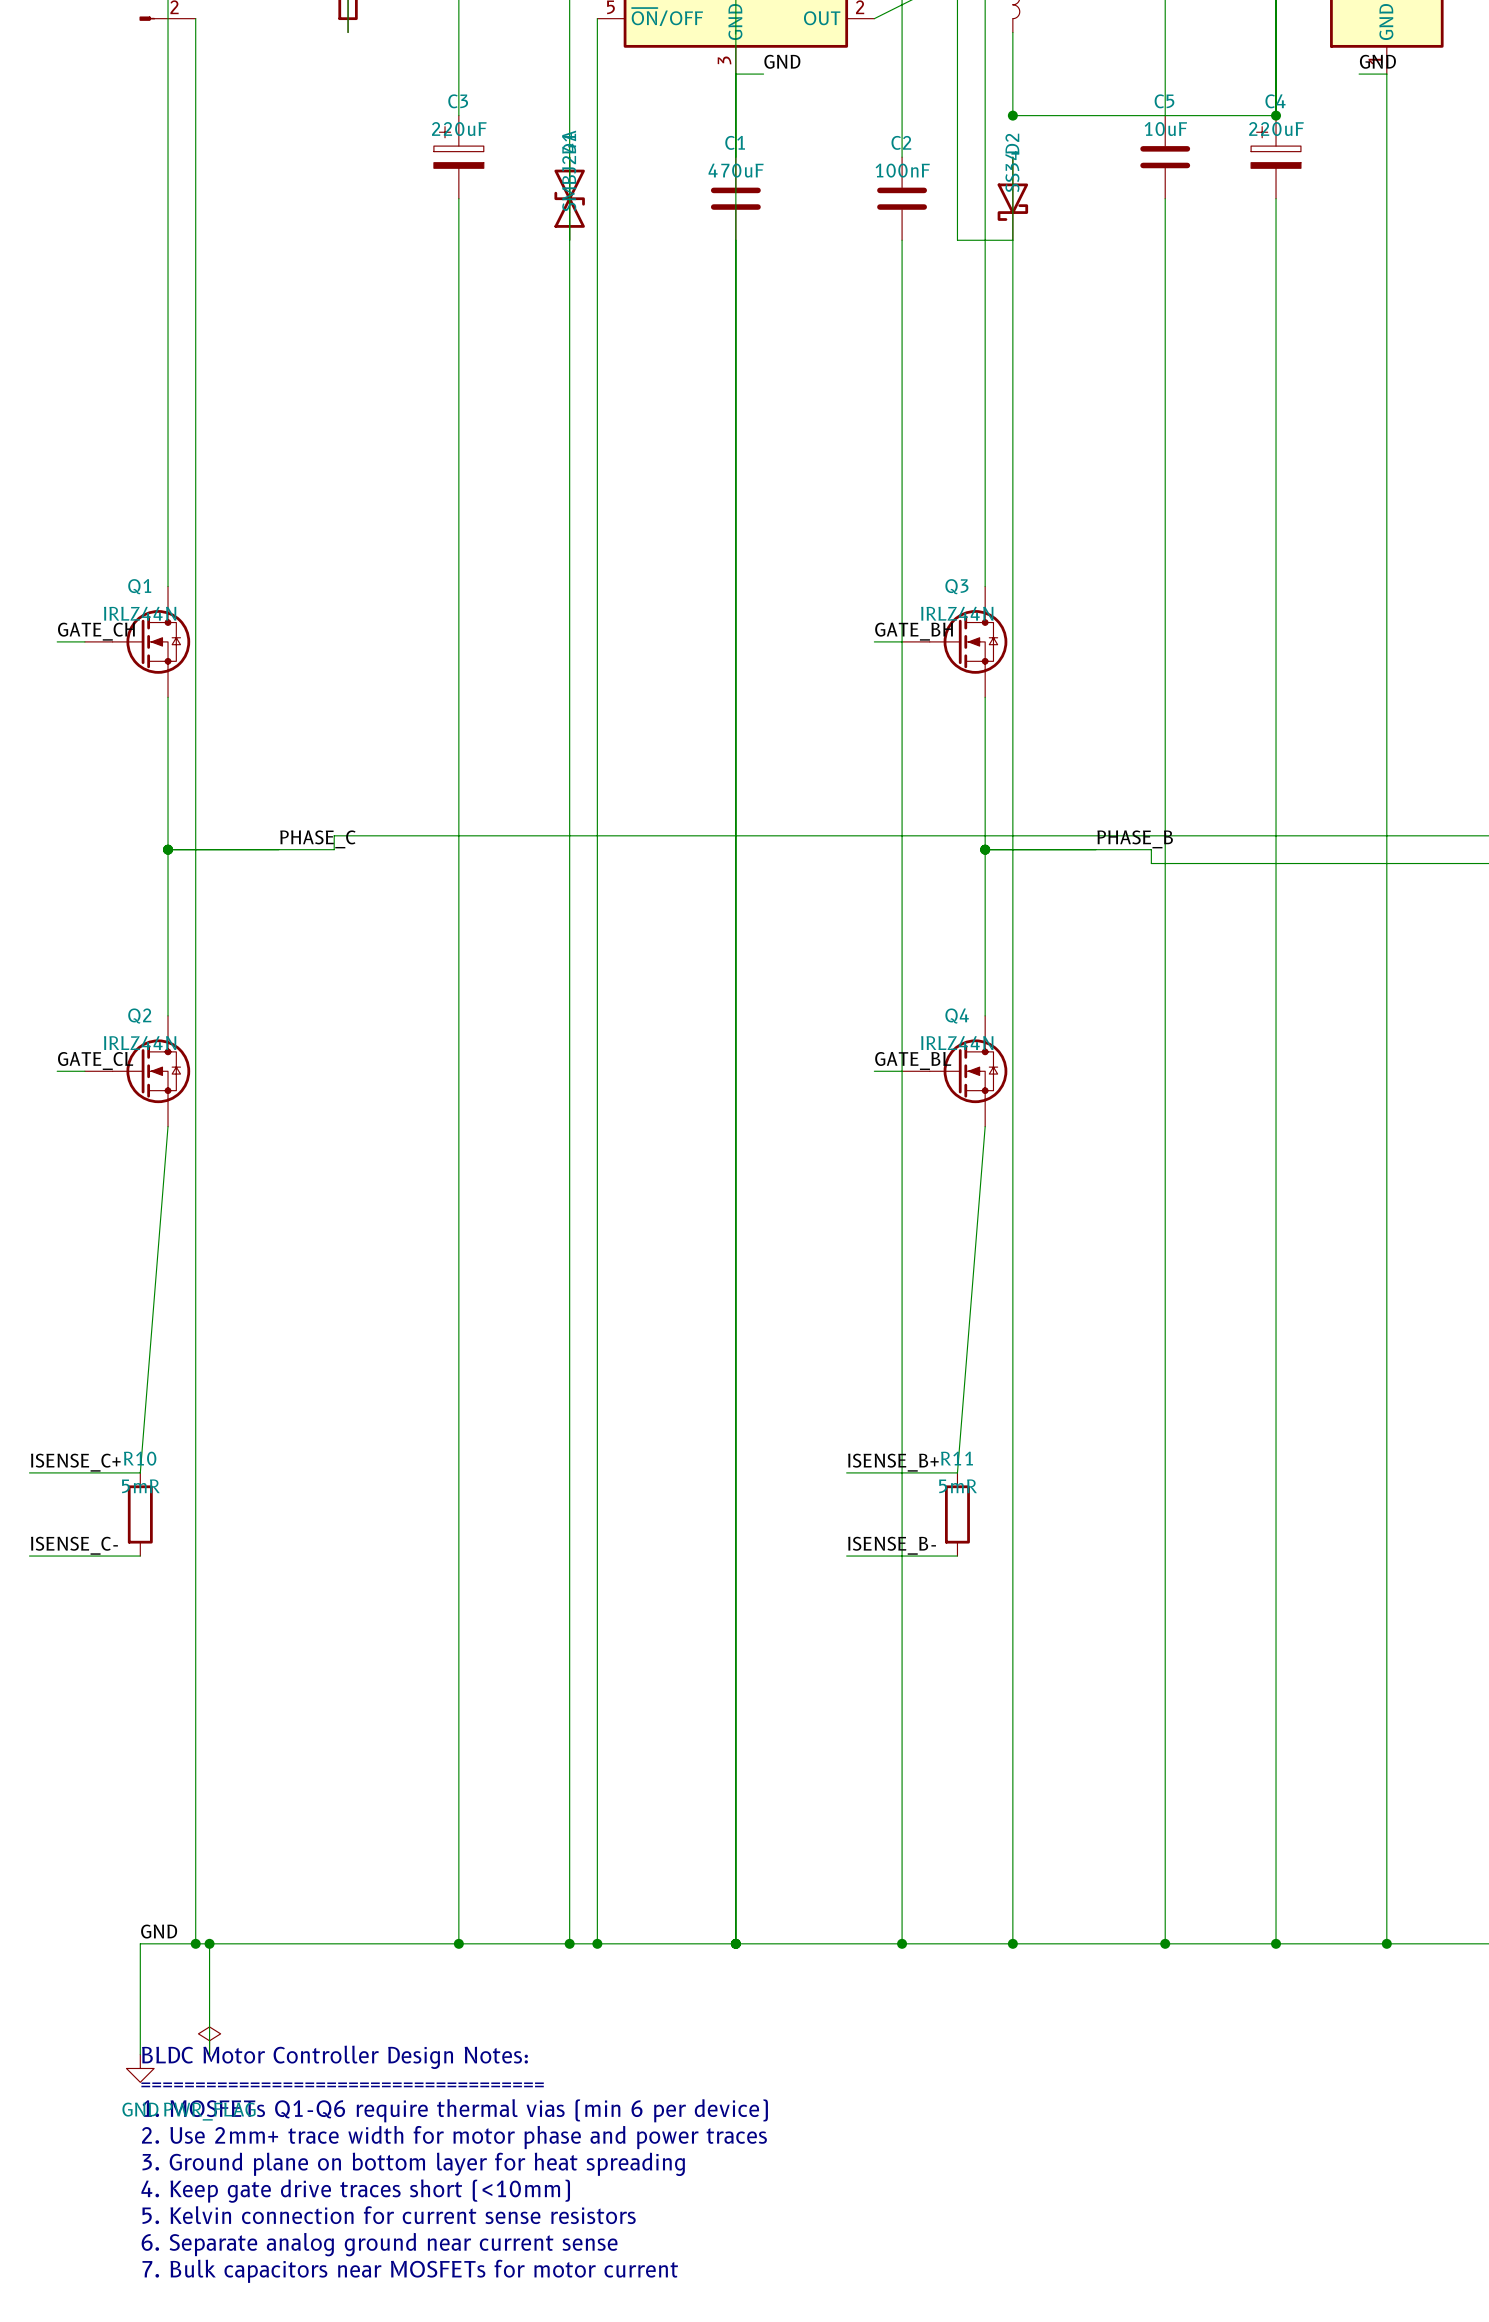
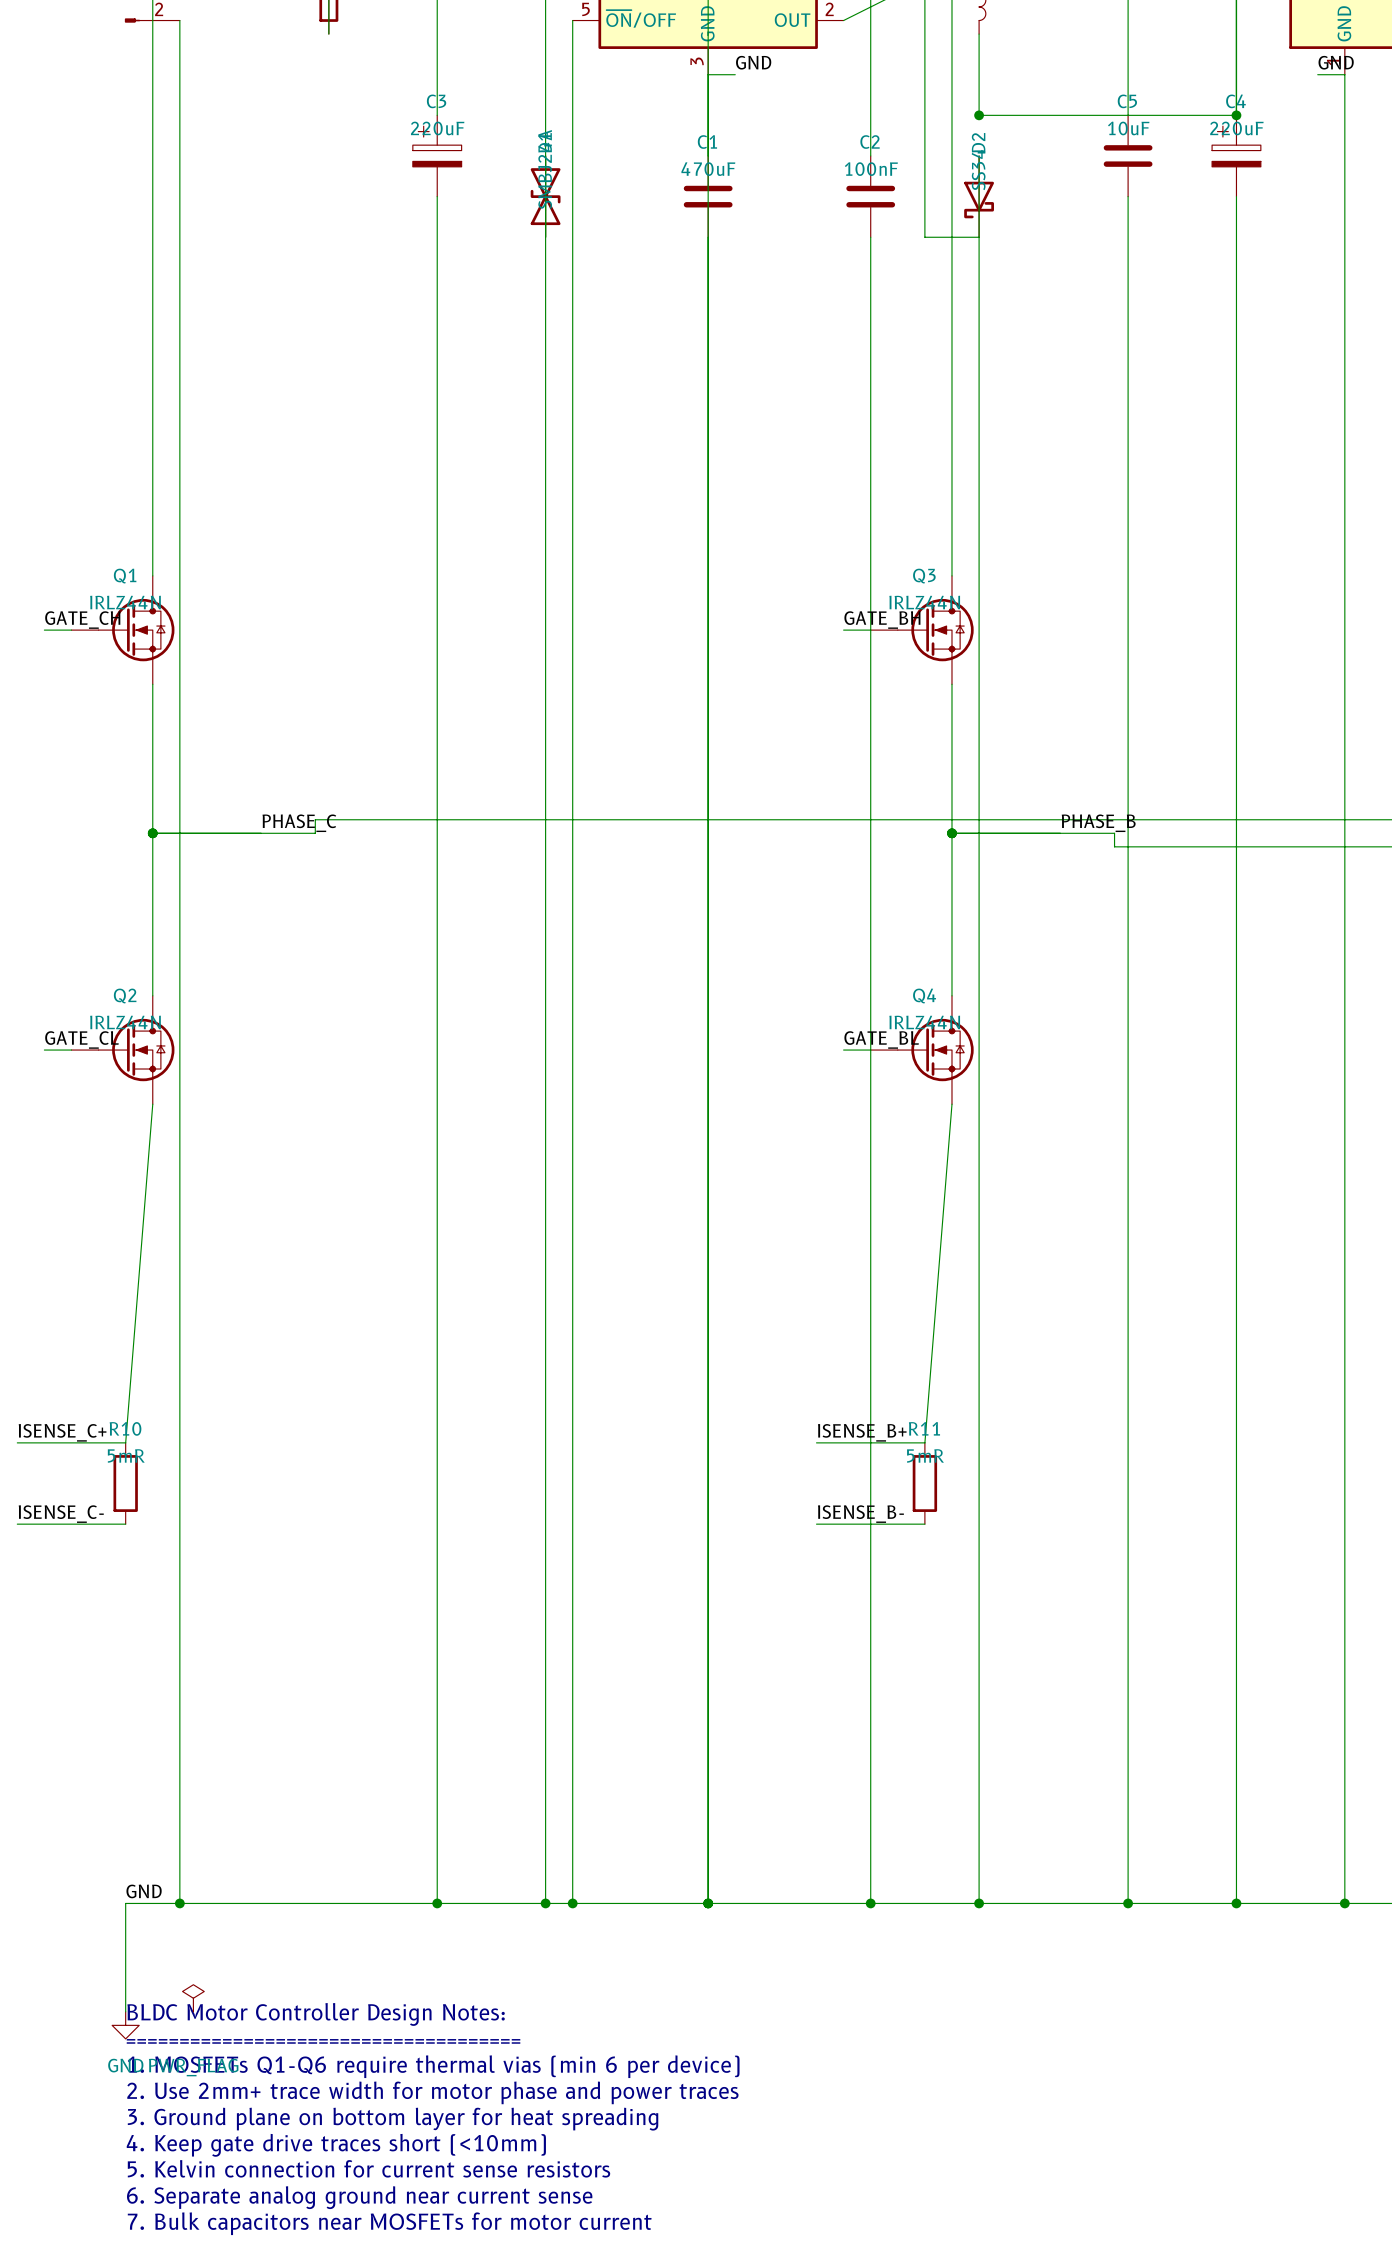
wire: (209, 1943) (209, 2054) -> none
junction: (209, 1943) -> none

